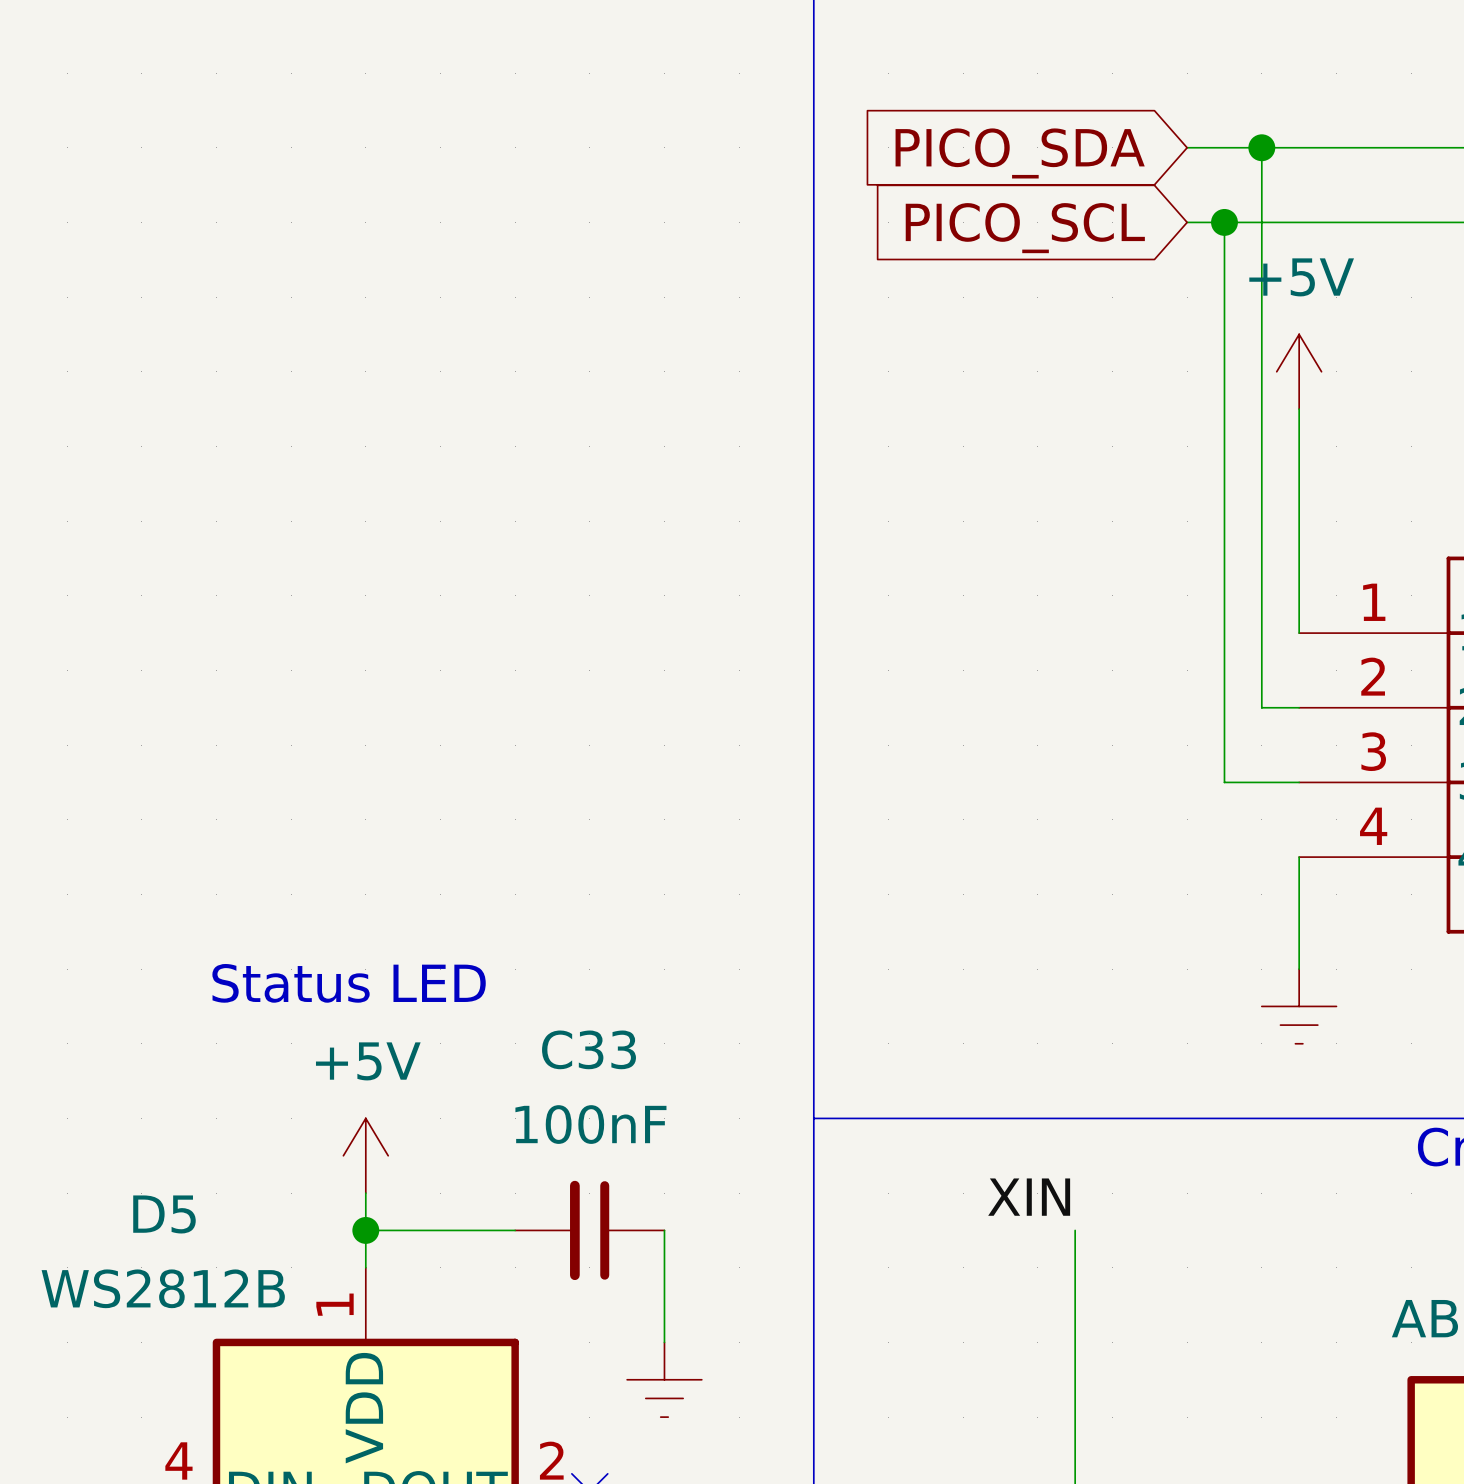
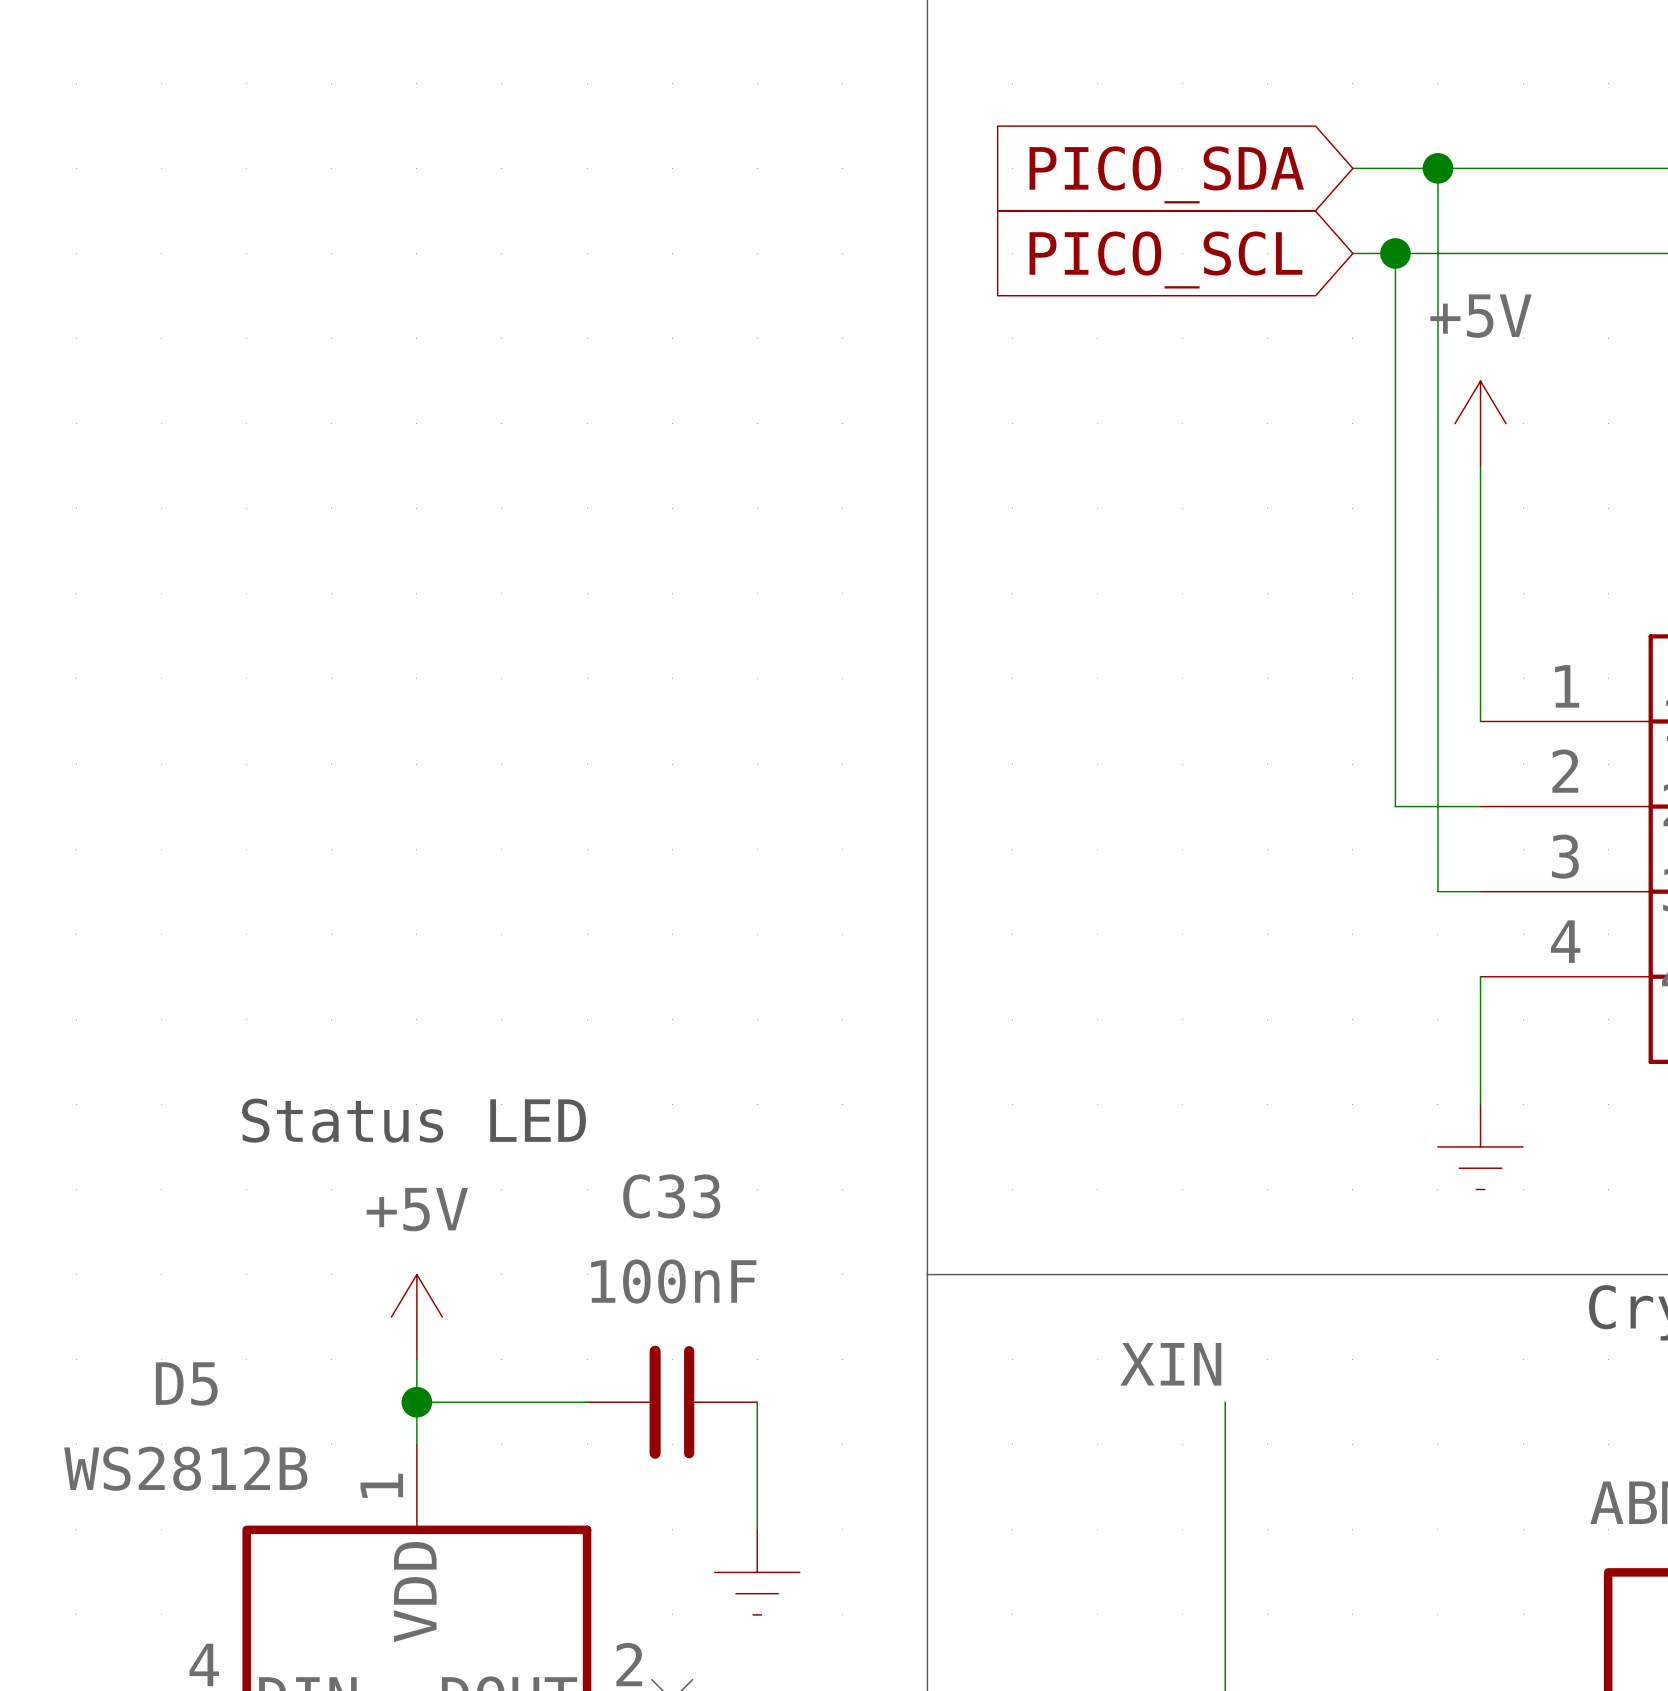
wire: (1224, 707) (1224, 782) (1261, 782) -> (1395, 806) (1437, 806) (1437, 891)

